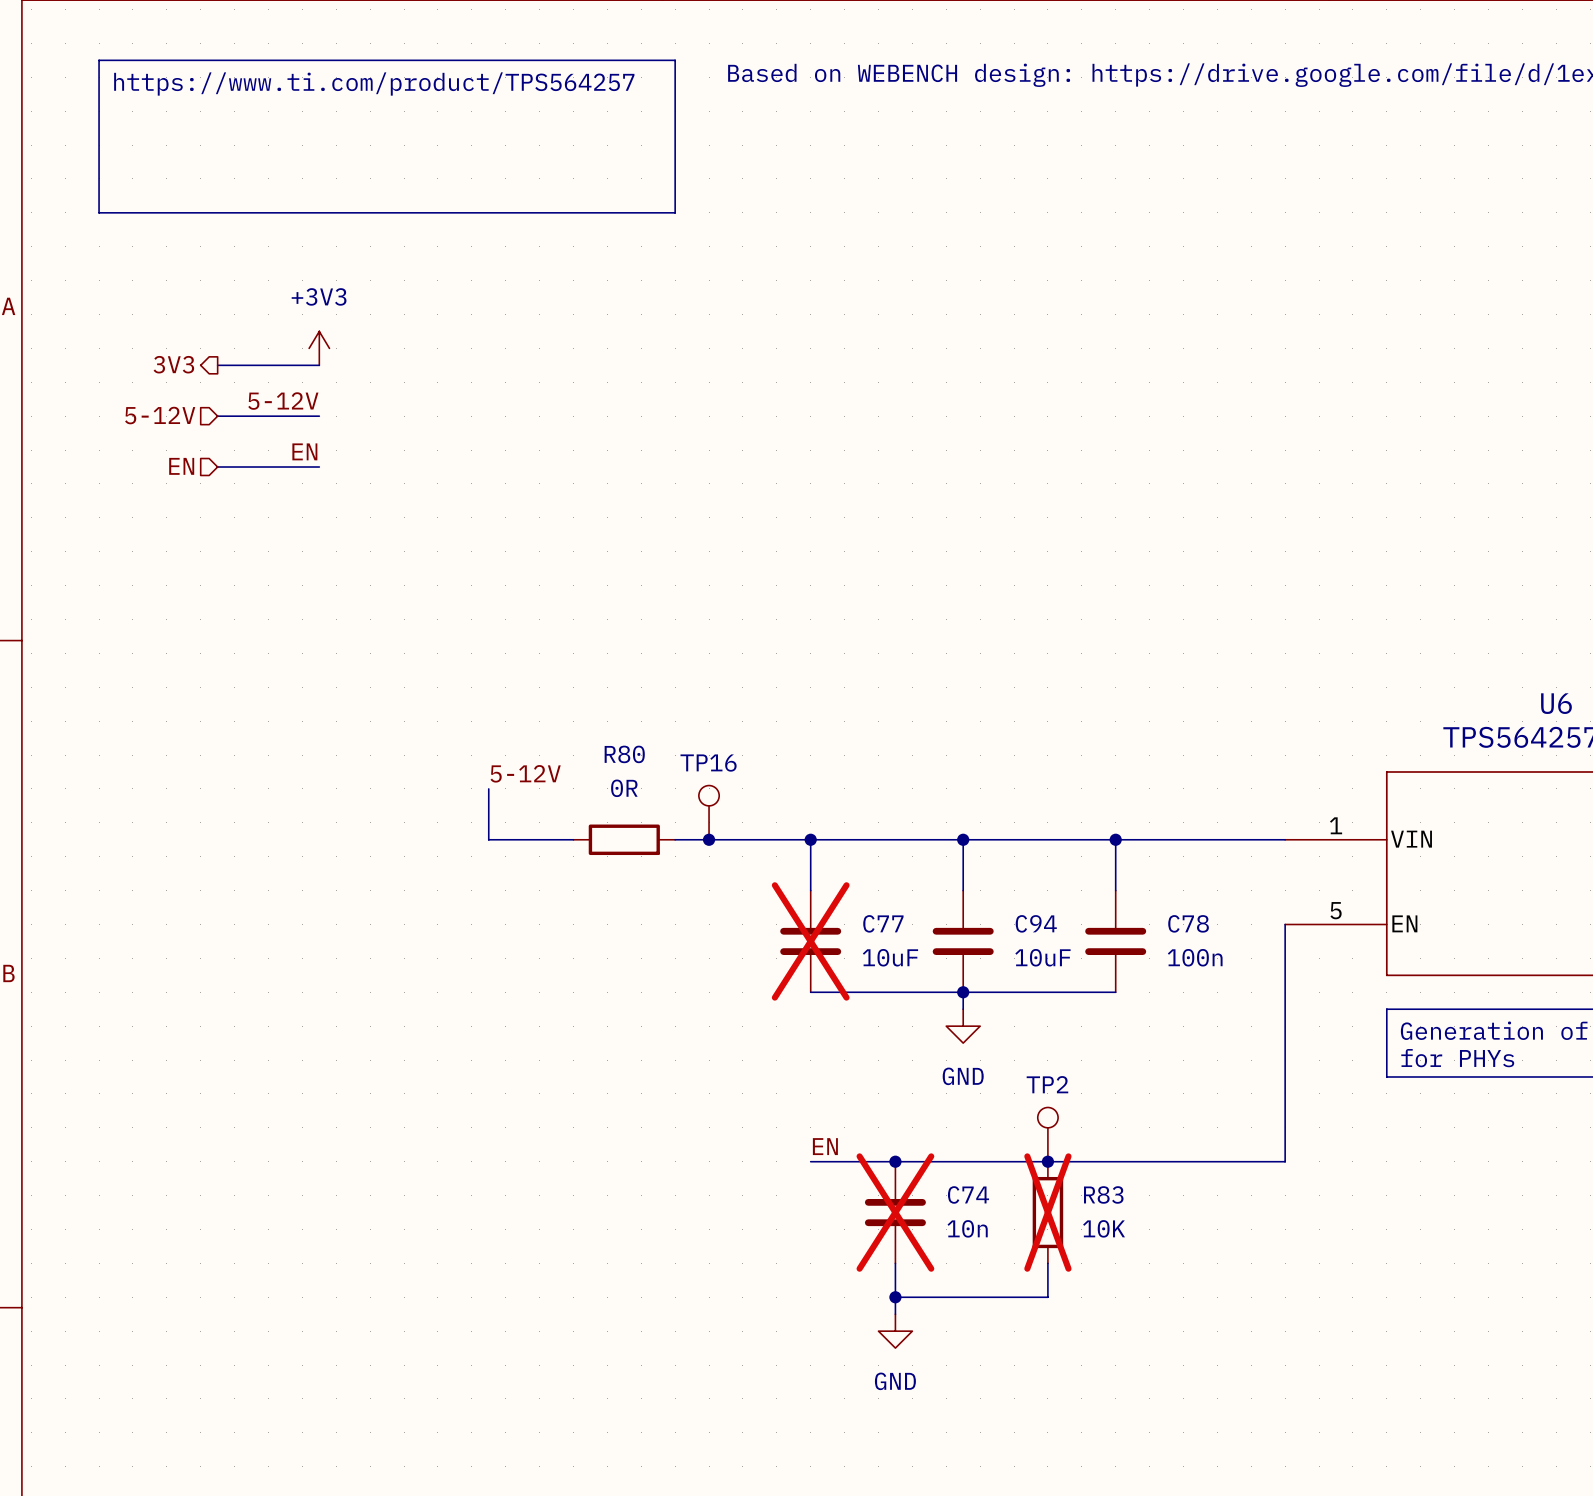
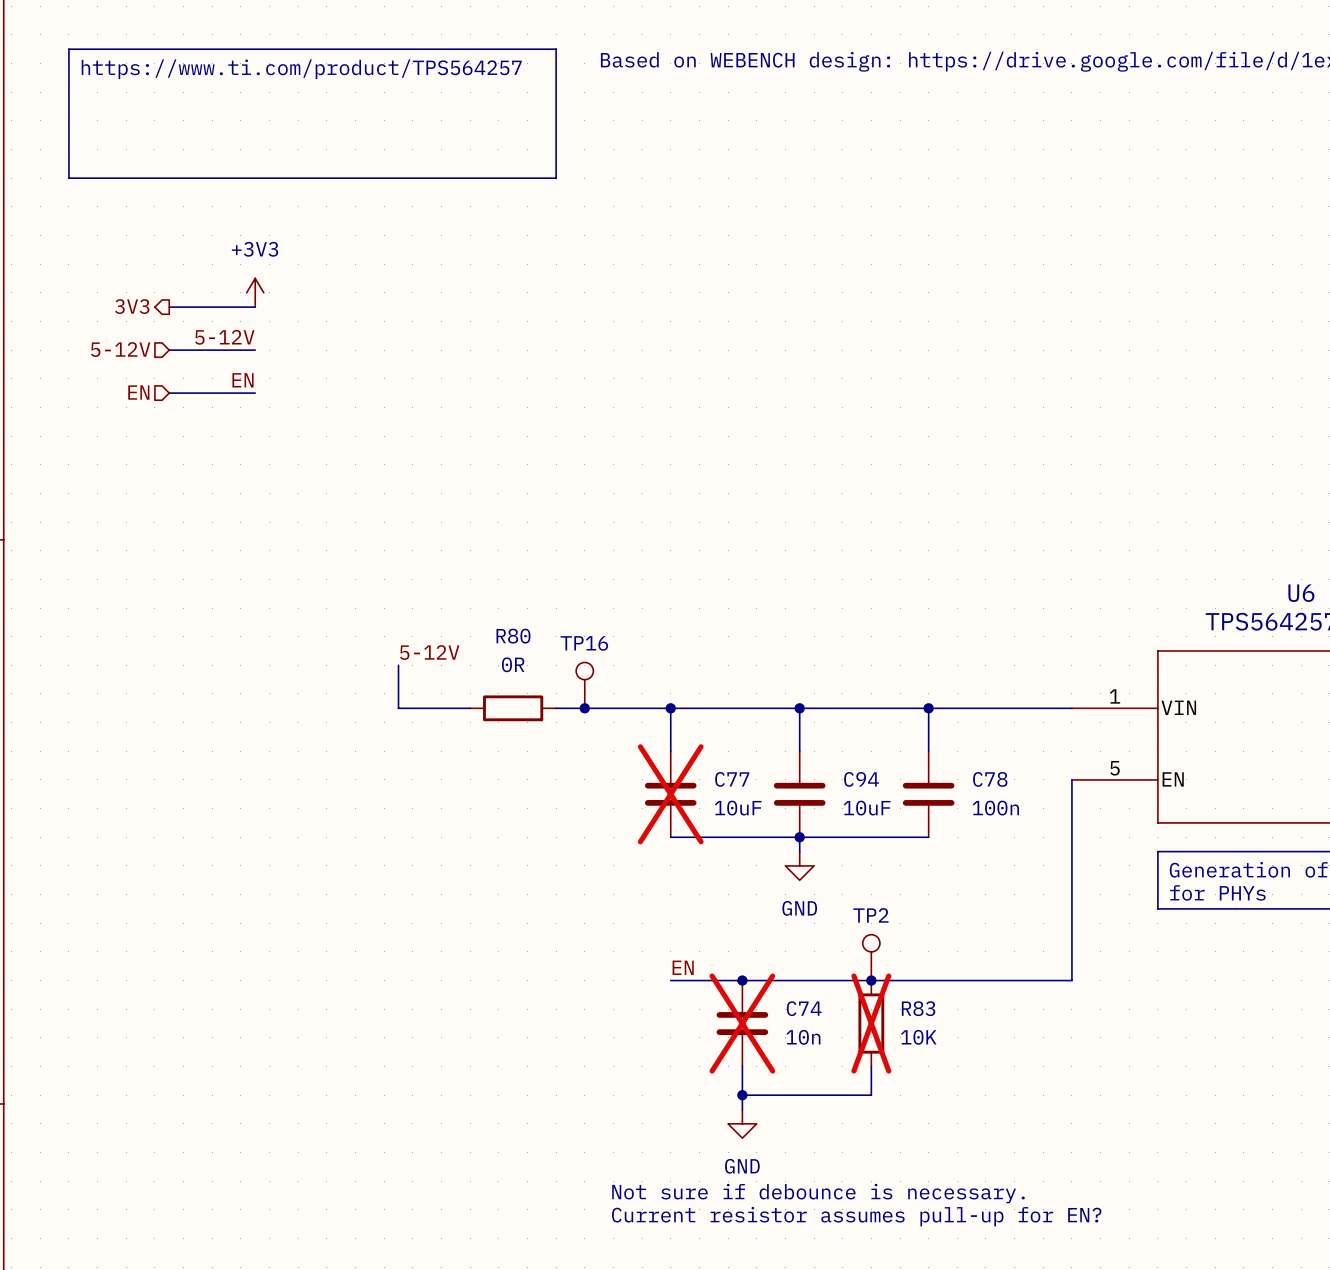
text: none -> Not sure if debounce is necessary. (818, 1193)
text: none -> Current resistor assumes pull-up for EN? (856, 1216)

